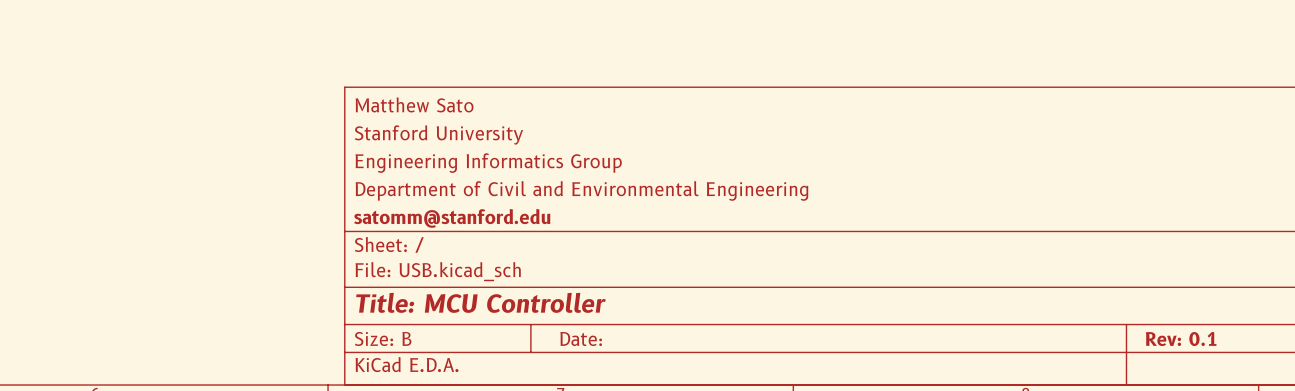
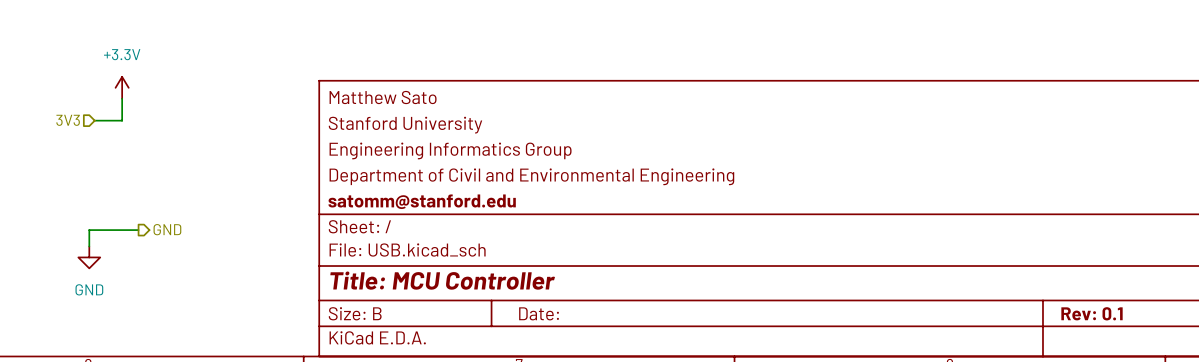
power symbol: none -> +3.3V (122, 87)
wire: none -> (122, 98) (122, 120) (94, 120)
hierarchical label: none -> 3V3 (68, 120)
wire: none -> (138, 230) (89, 230) (89, 246)
hierarchical label: none -> GND (167, 229)
power symbol: none -> GND (89, 257)

